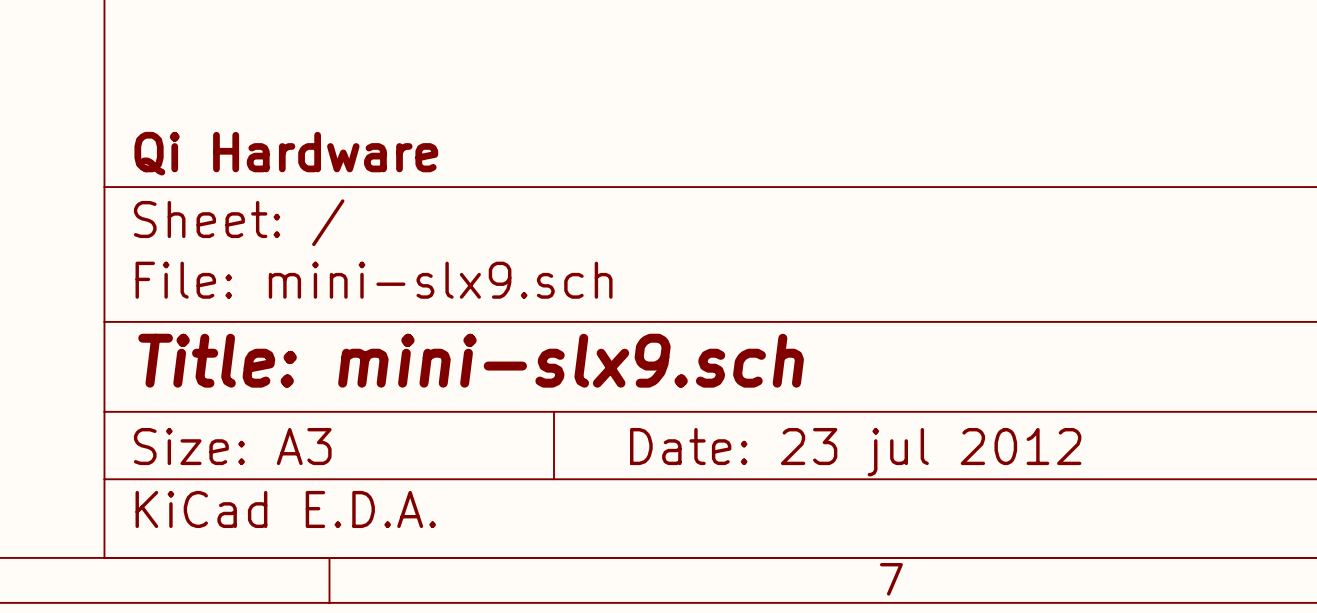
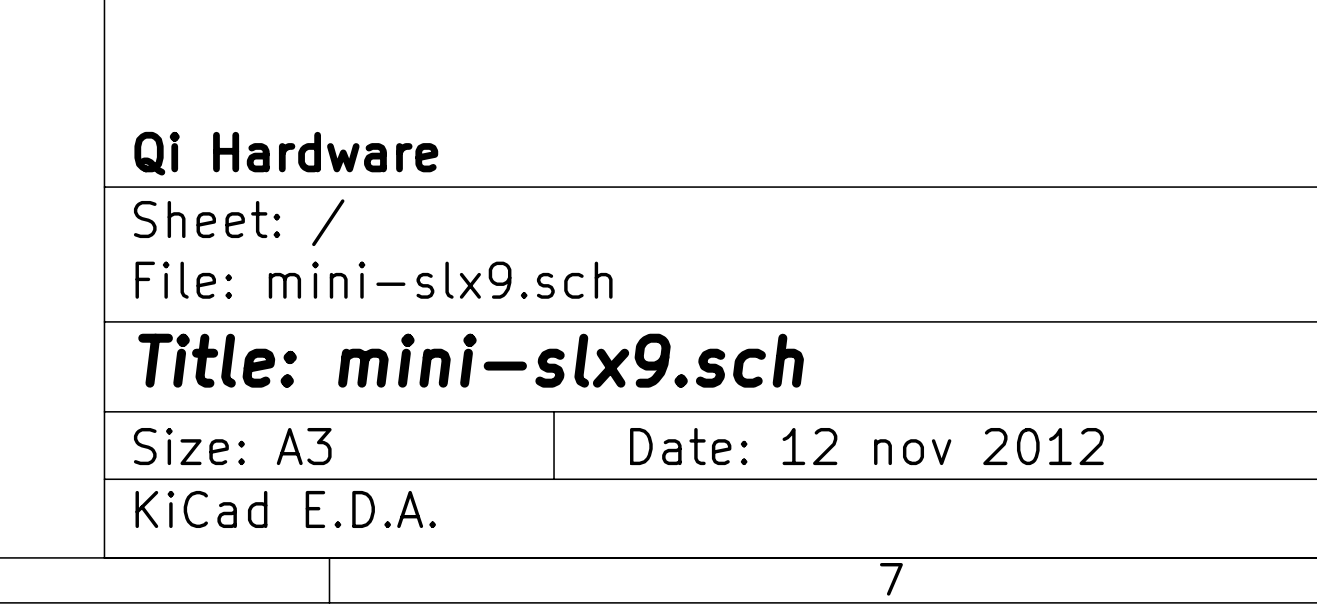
title block: Date: 23 jul 2012 (855, 452) -> Date: 12 nov 2012 (866, 446)

